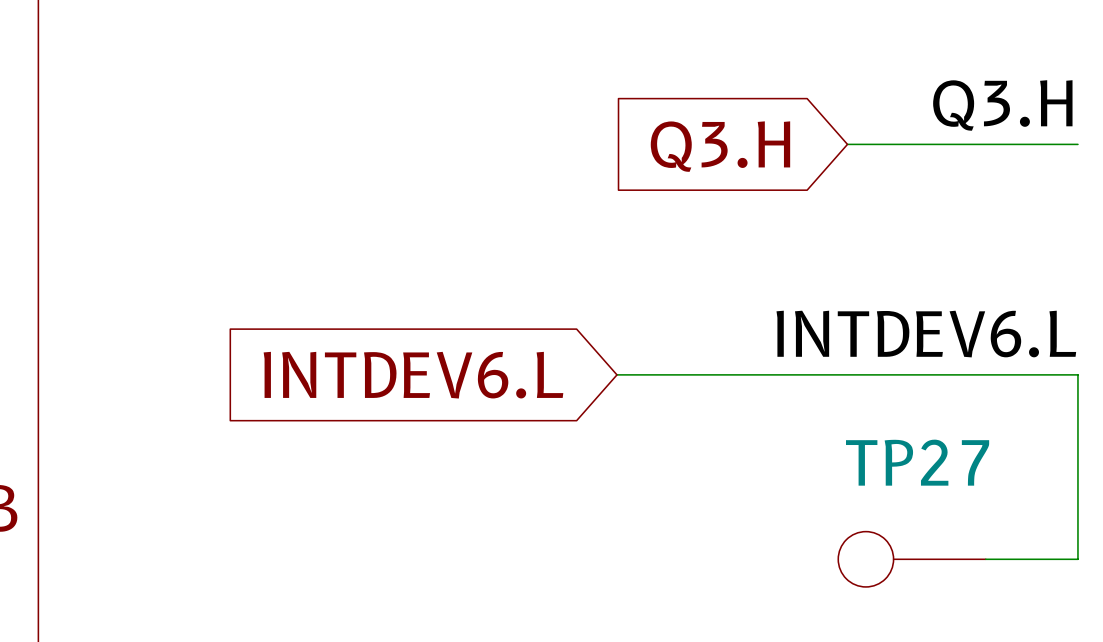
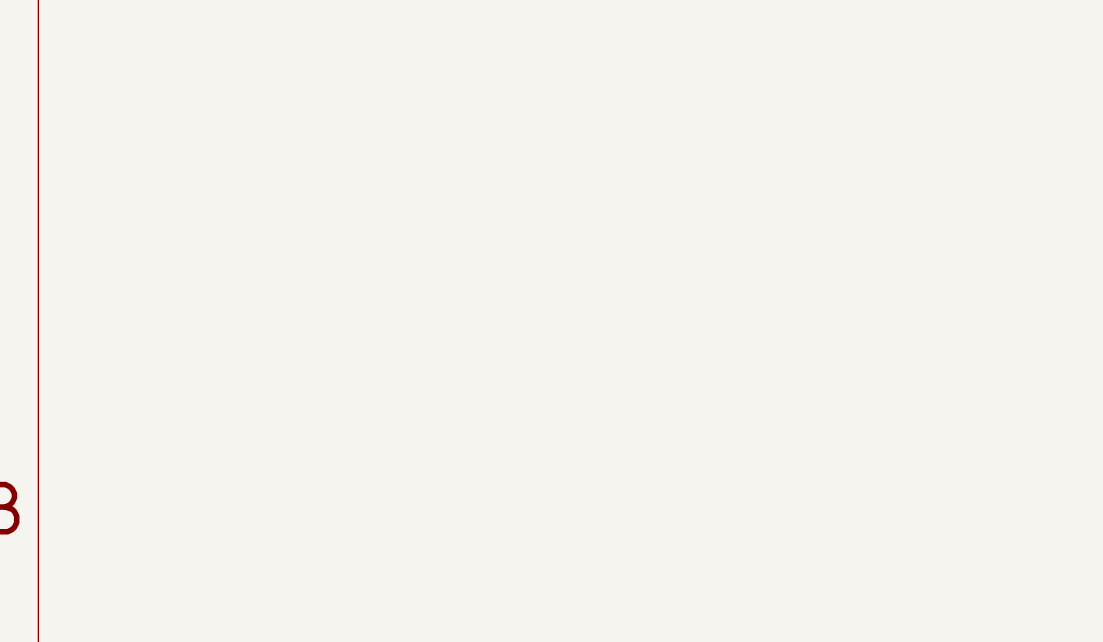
label: Q3.H (1002, 105) -> none
wire: (847, 144) (1077, 144) -> none
global label: Q3.H (720, 146) -> none
label: INTDEV6.L (926, 334) -> none
wire: (616, 374) (1077, 374) (1077, 559) (985, 559) -> none
global label: INTDEV6.L (413, 375) -> none
TP27: (912, 559) -> none

